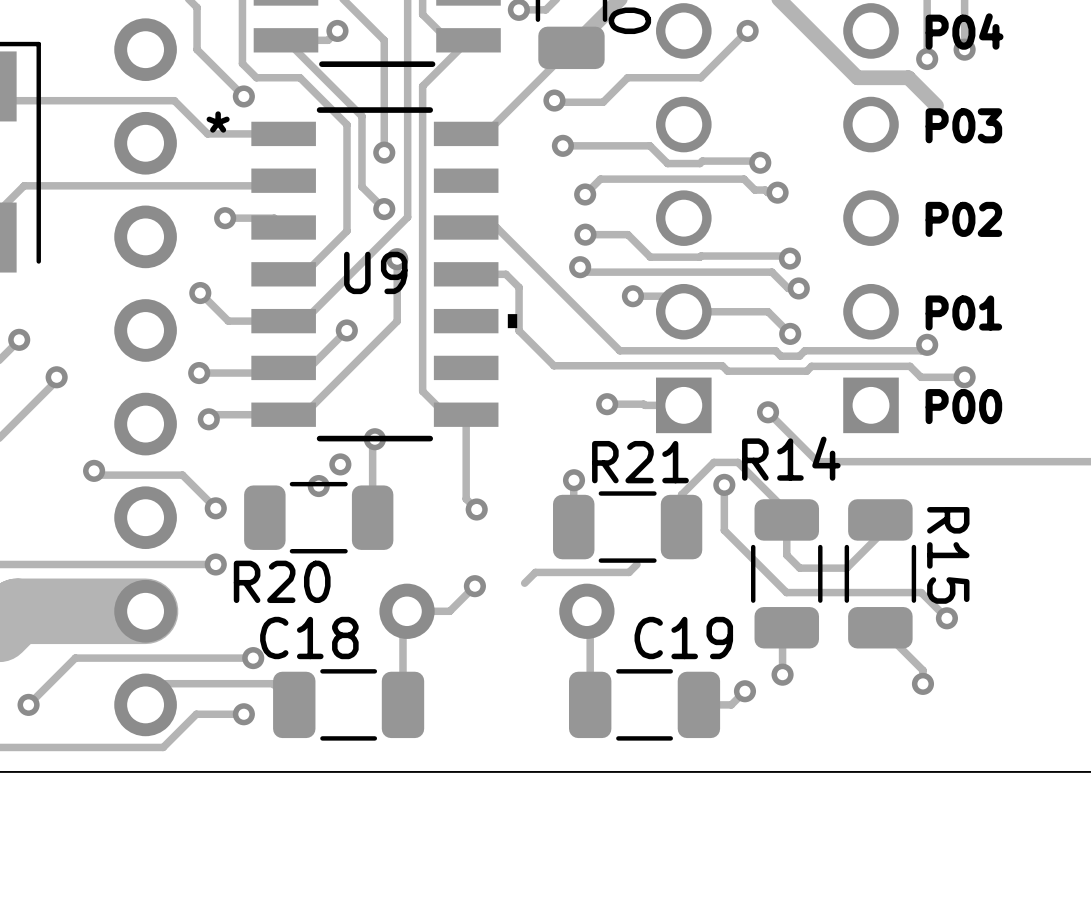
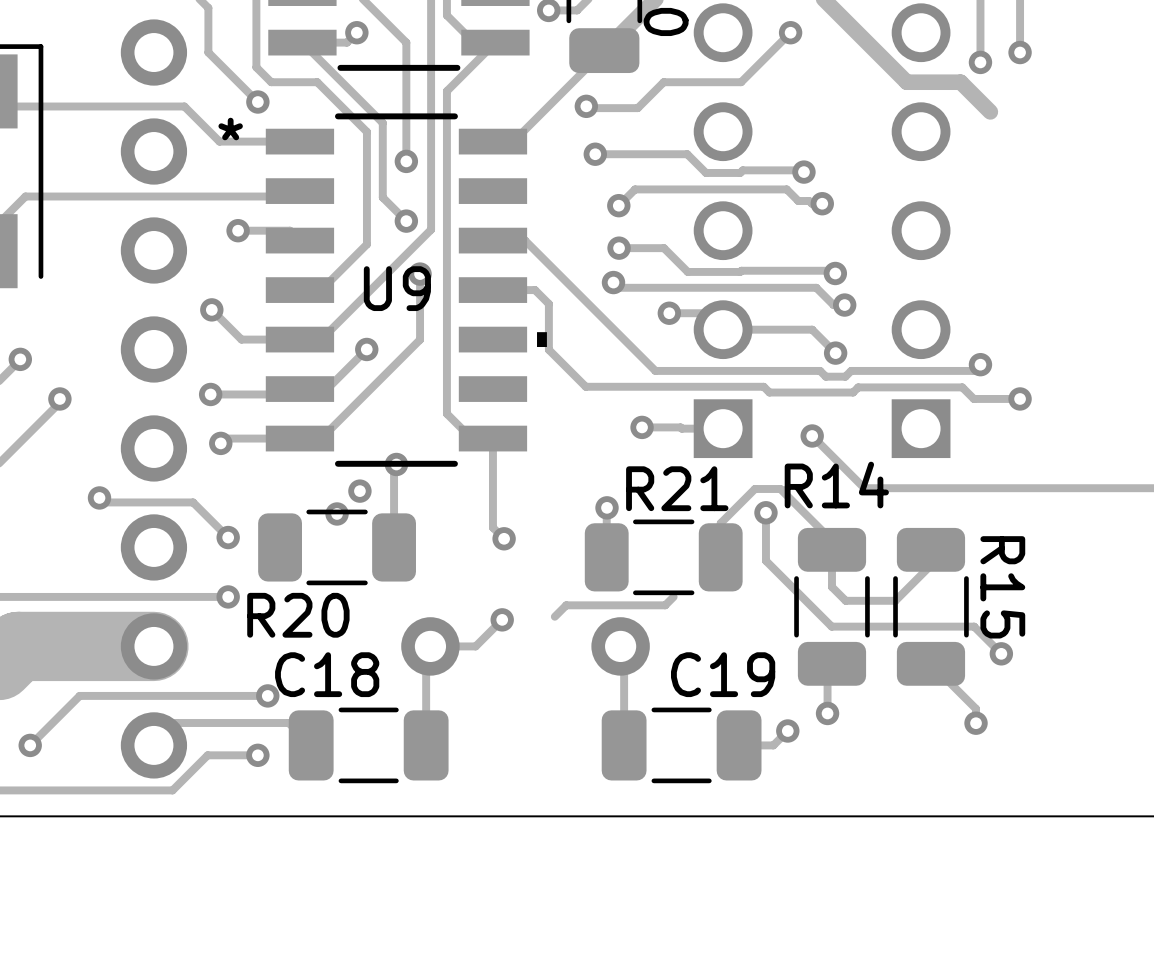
text: P04 (964, 31) -> none
text: P03 (963, 125) -> none
text: P02 (963, 219) -> none
text: P01 (963, 313) -> none
text: P00 (963, 406) -> none

